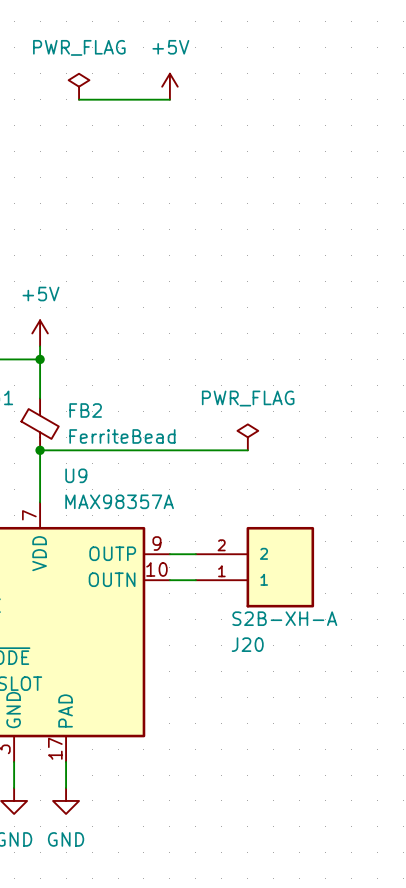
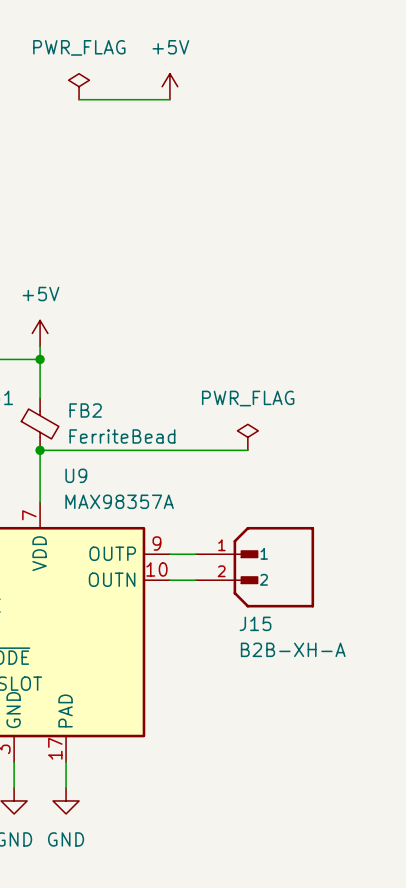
J20: S2B-XH-A (255, 567) -> none
J15: none -> B2B-XH-A (255, 567)

